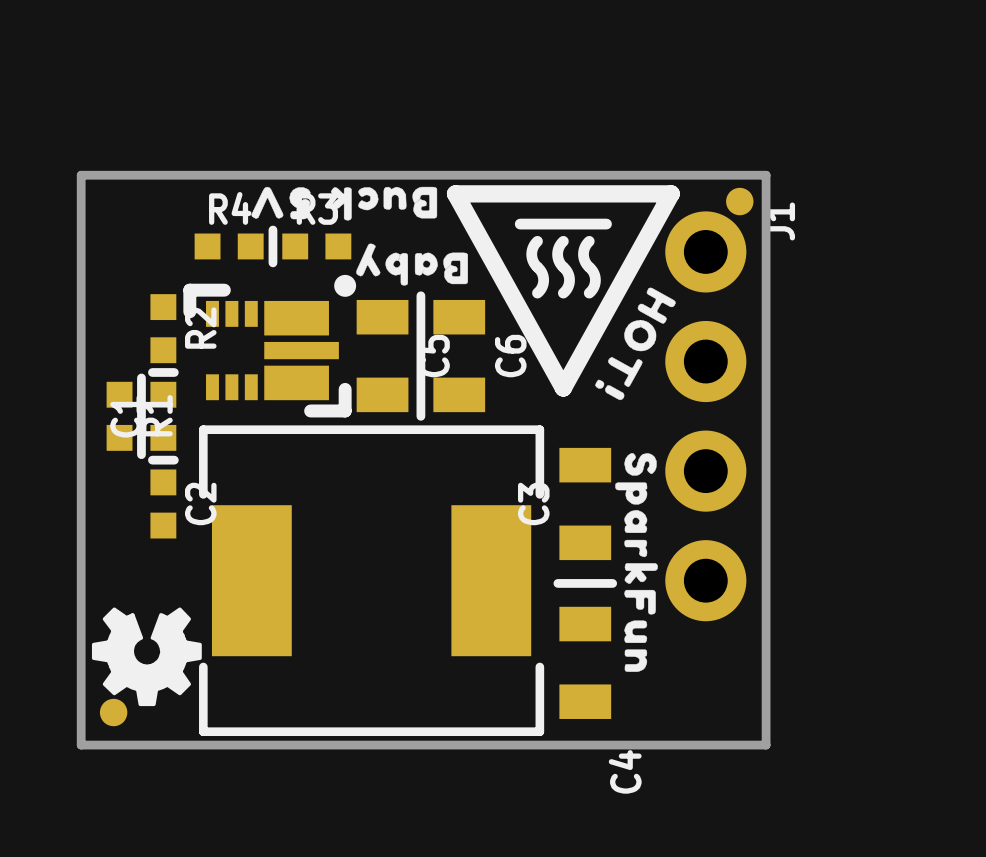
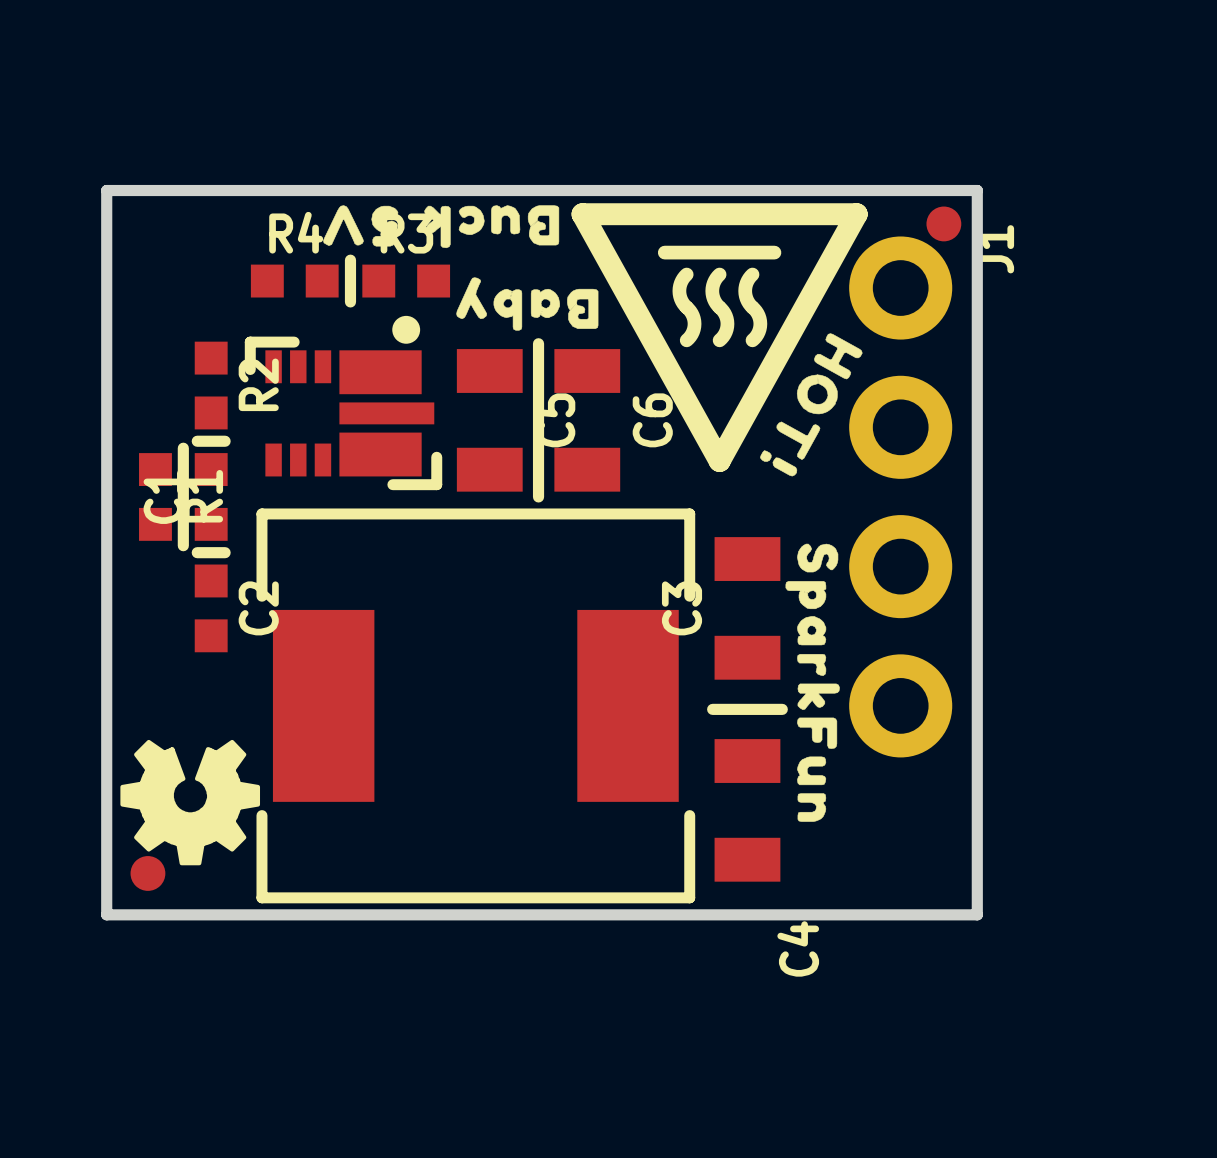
part footprint: [183, 274, 357, 418] -> [244, 315, 443, 491]

